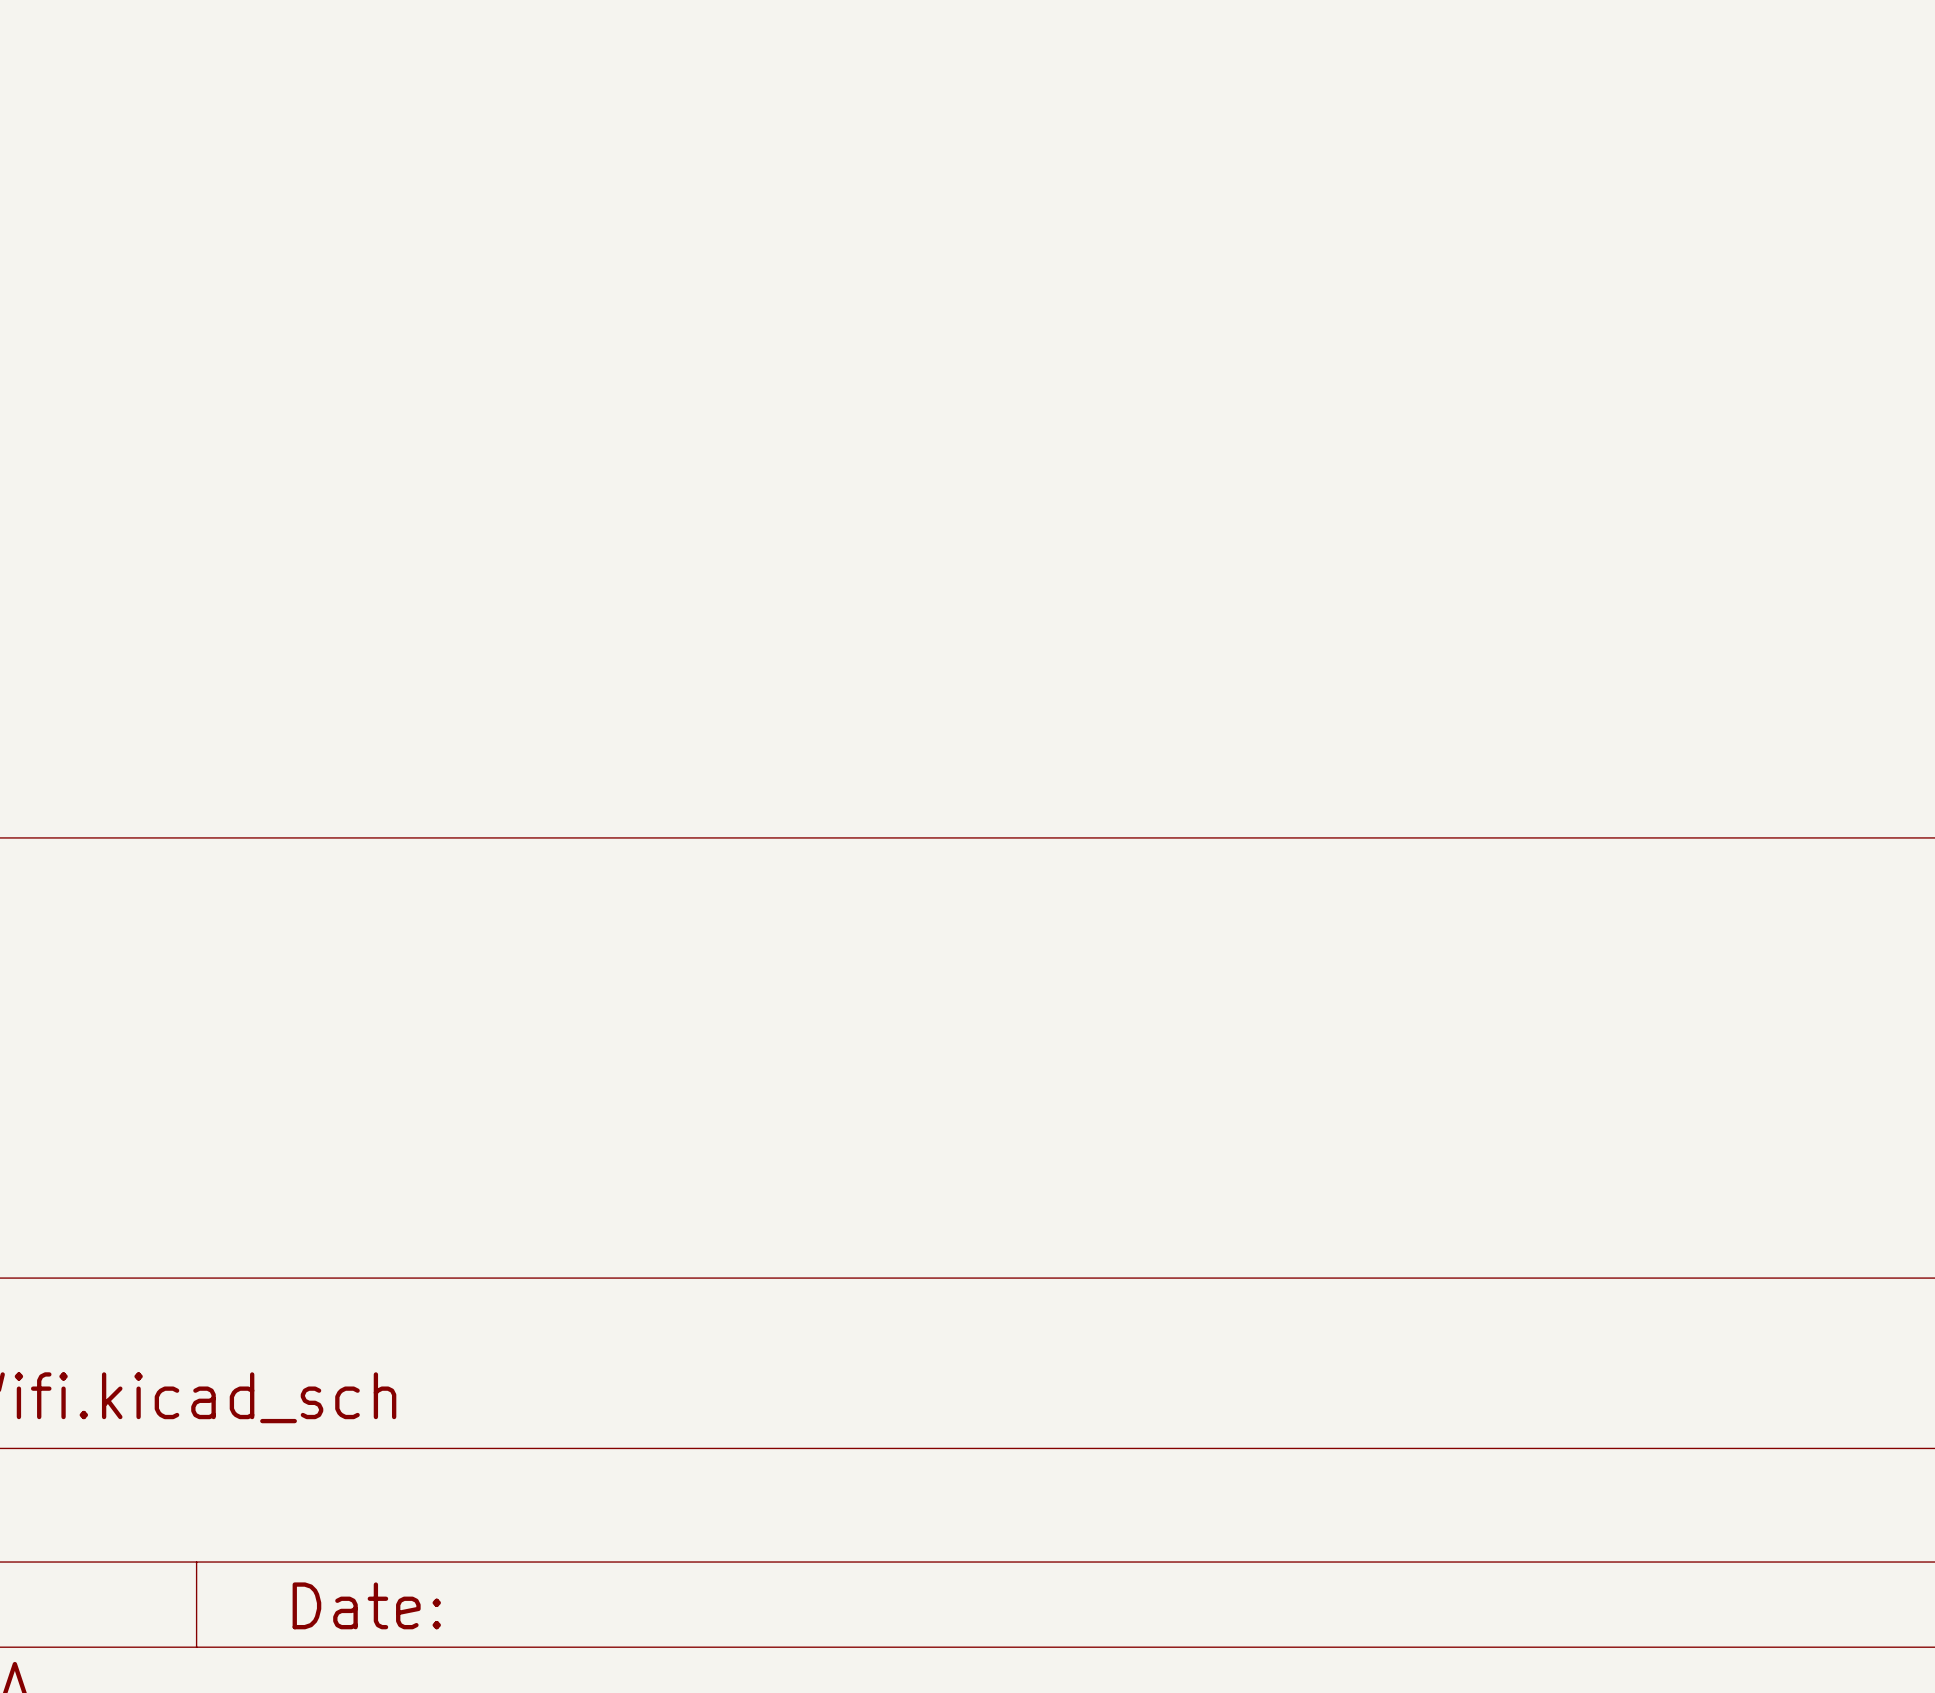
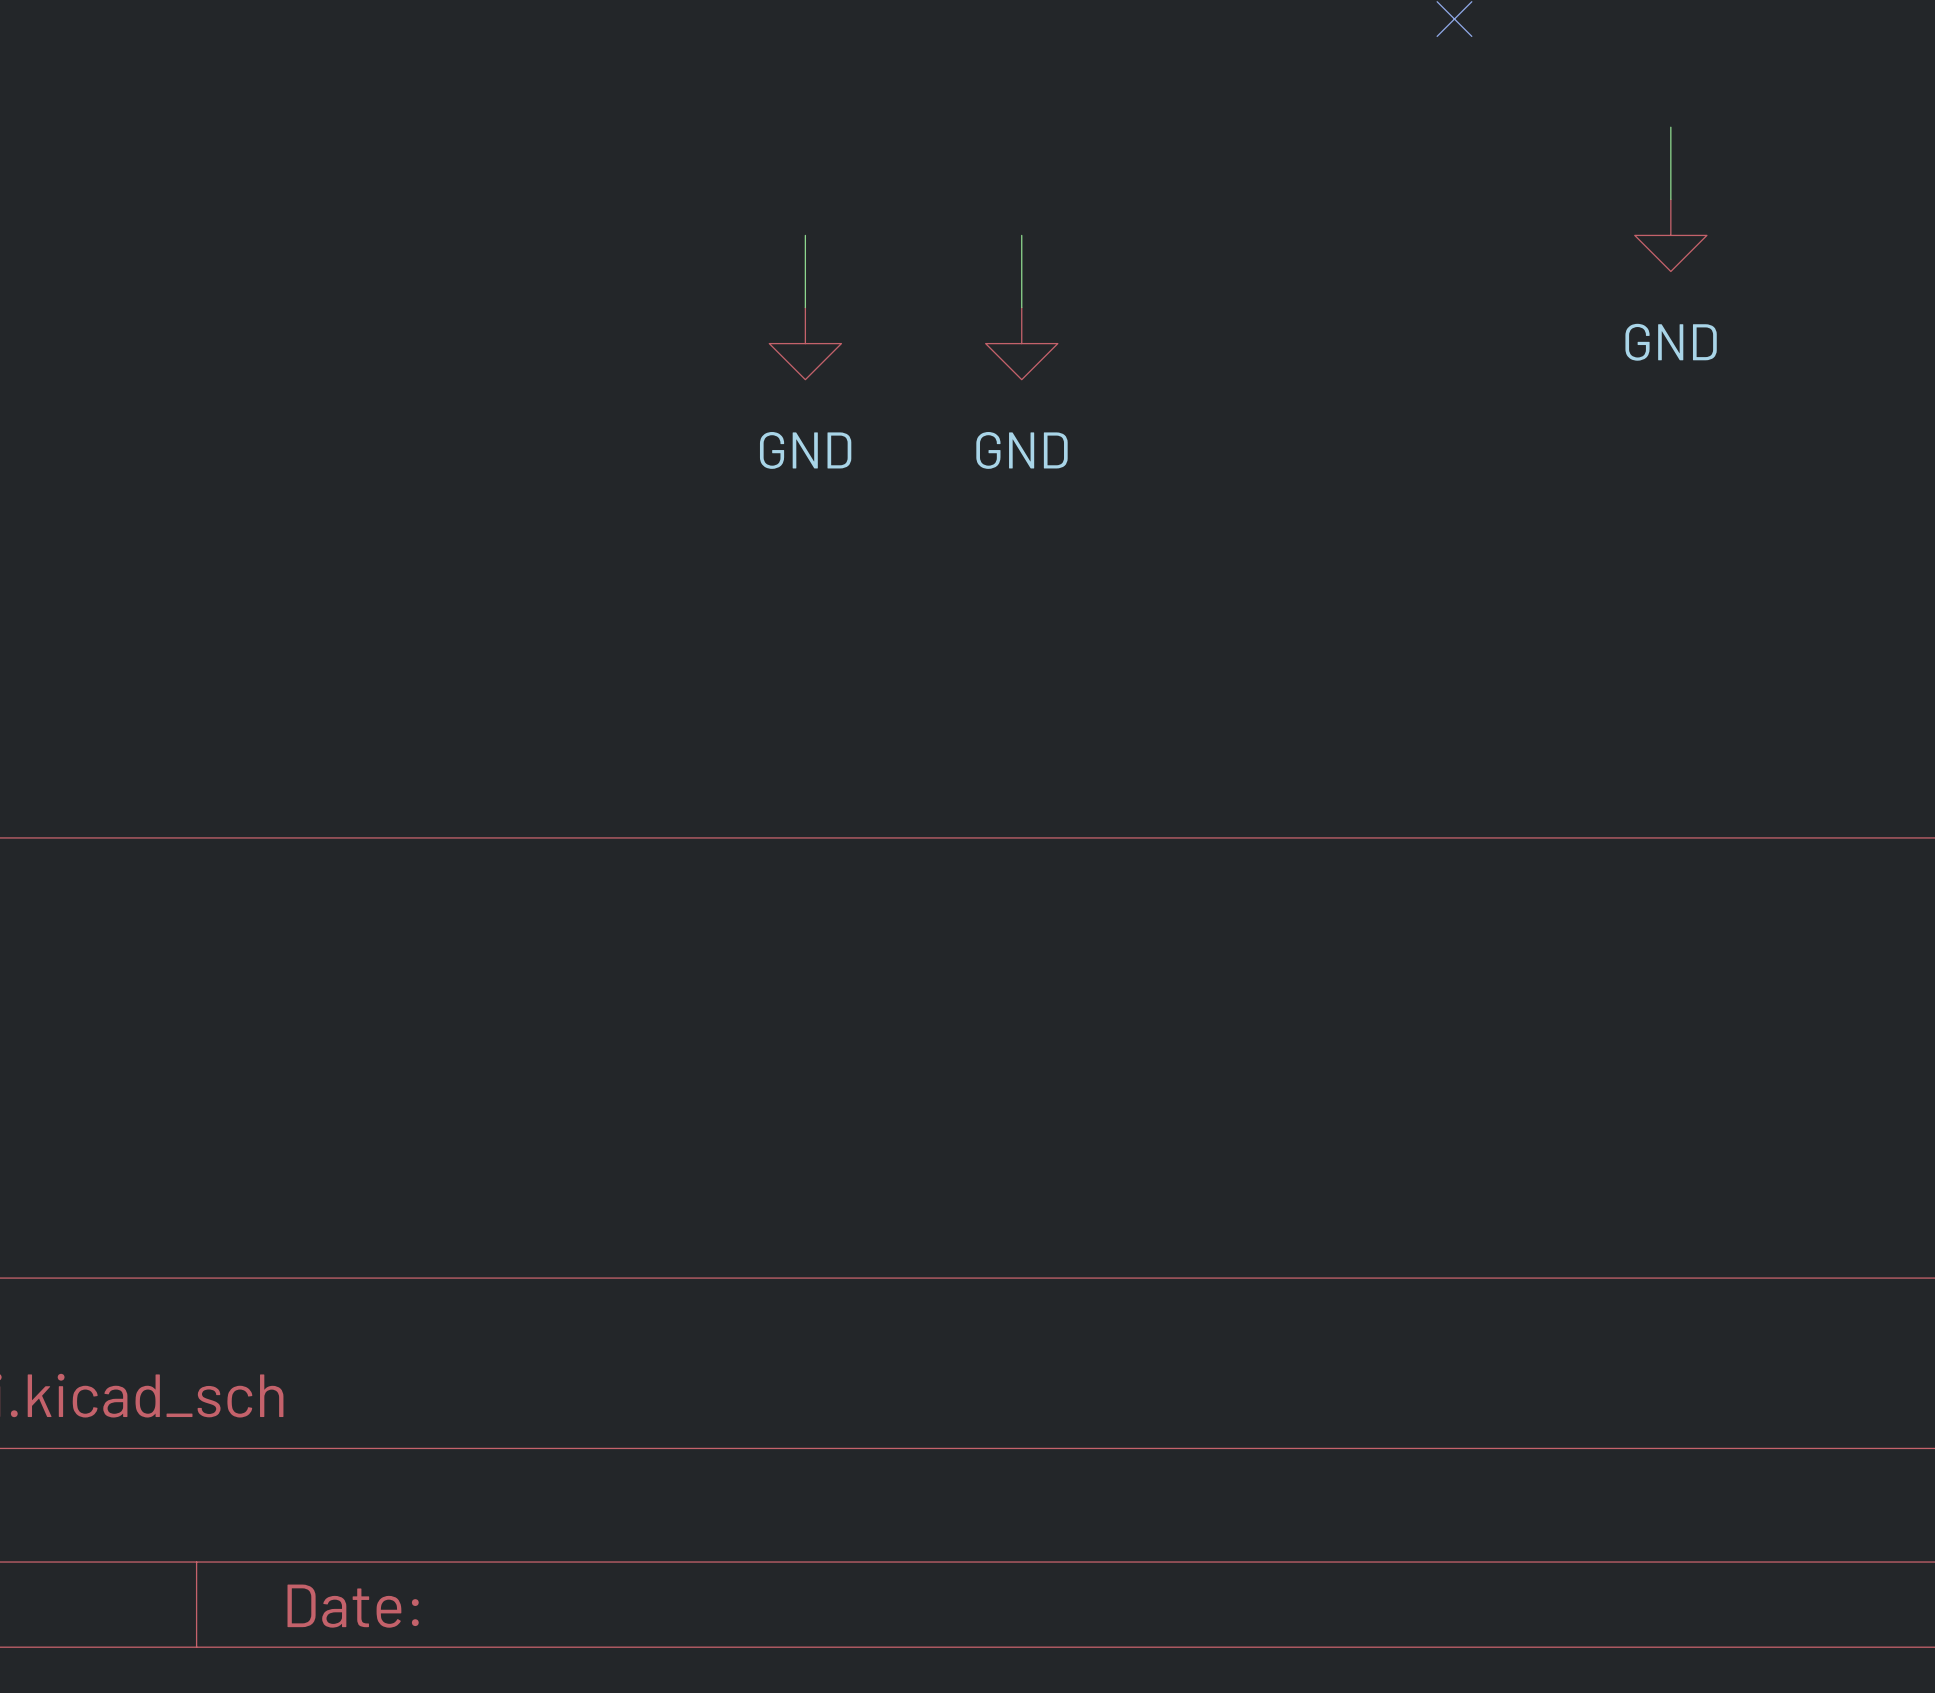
no-connect mark: none -> (1454, 19)
wire: none -> (1670, 127) (1670, 199)
wire: none -> (805, 235) (805, 307)
wire: none -> (1021, 235) (1021, 307)
power symbol: none -> GND (1670, 235)
power symbol: none -> GND (805, 343)
power symbol: none -> GND (1021, 343)

